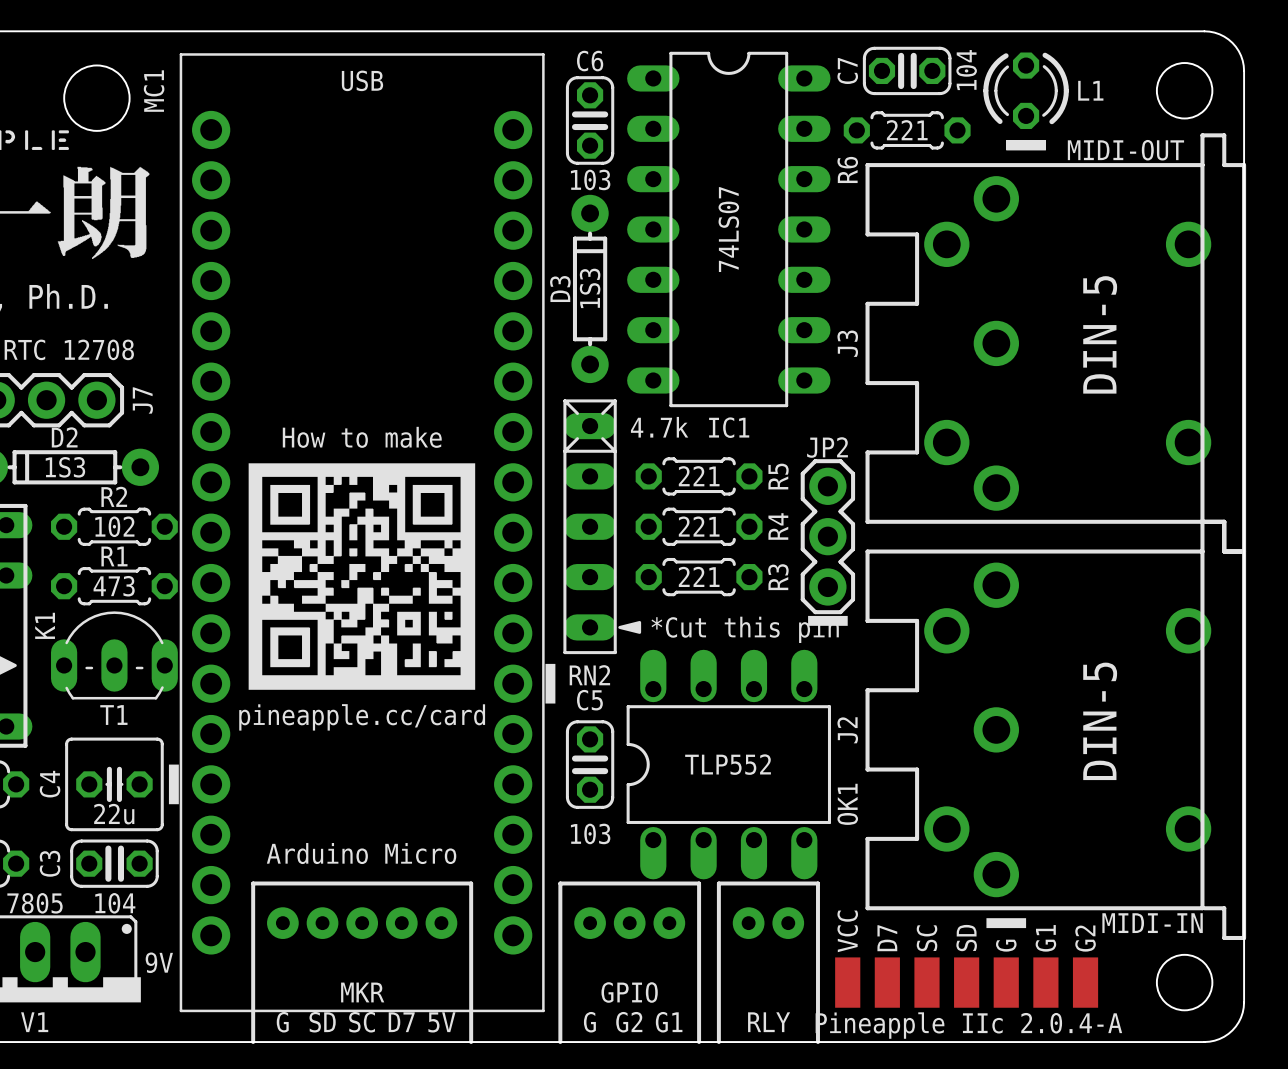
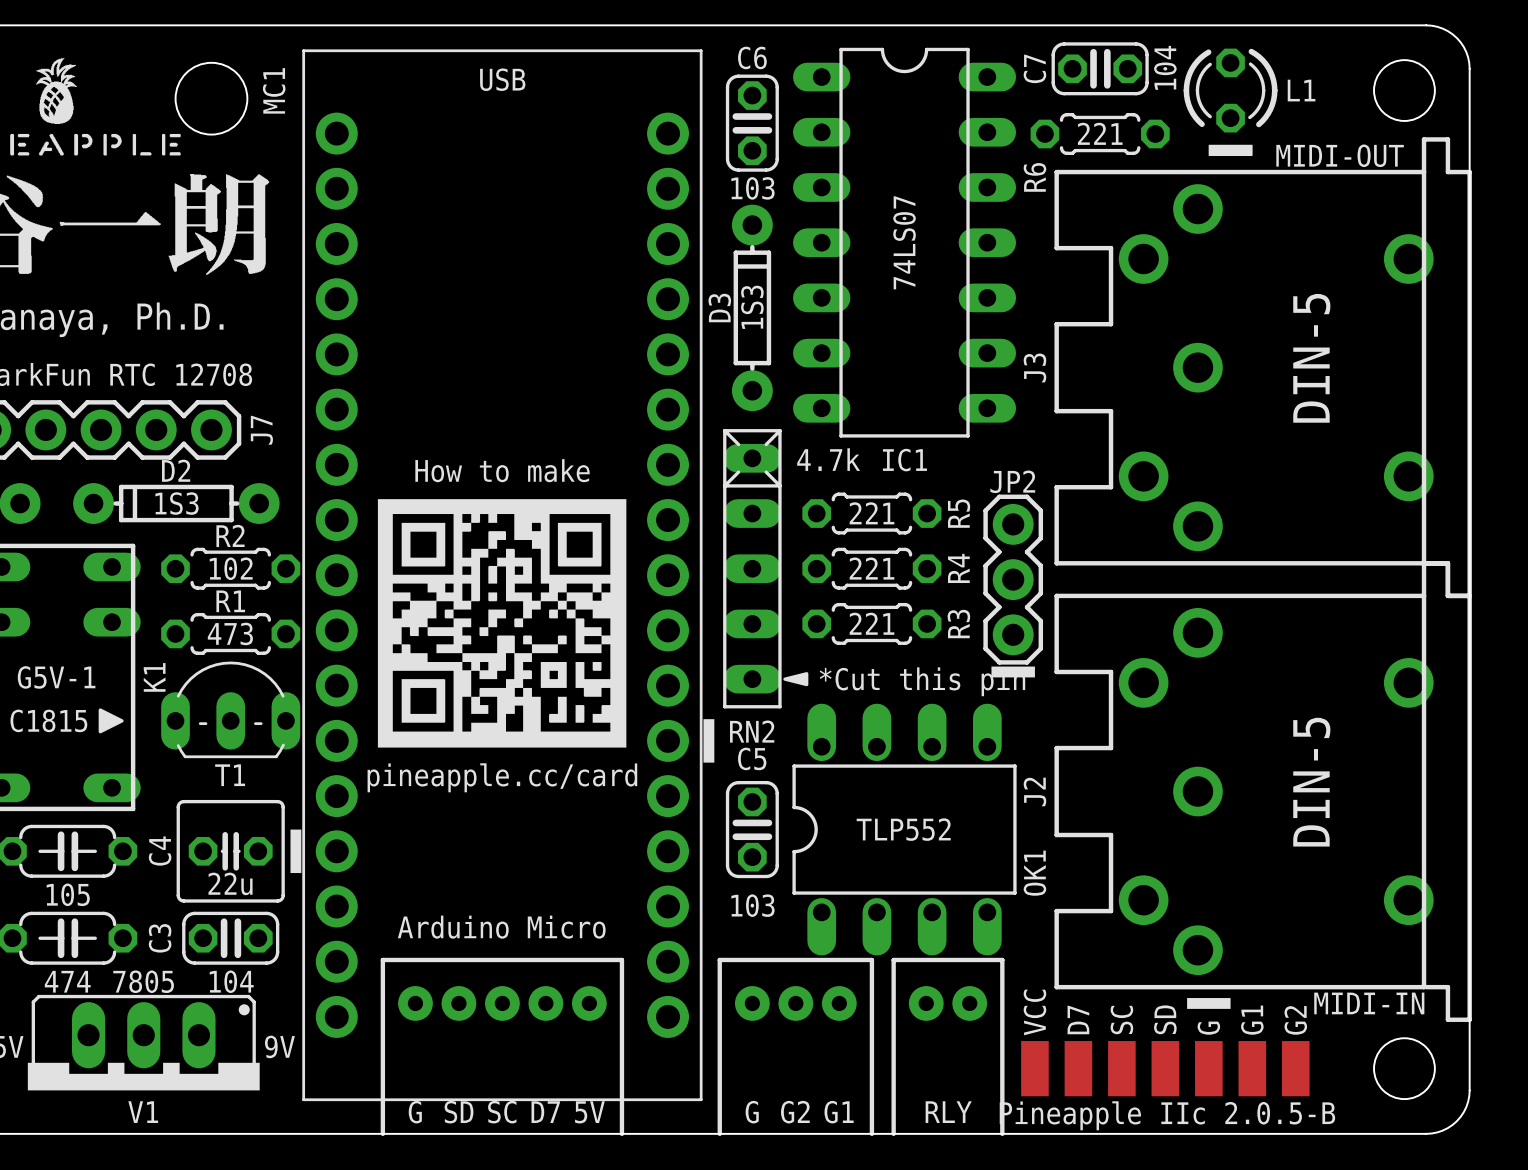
text: MKR (362, 992) -> none
text: GPIO (629, 992) -> none
text: Pineapple IIc 2.0.4-A (968, 1025) -> Pineapple IIc 2.0.5-B (1167, 1115)

